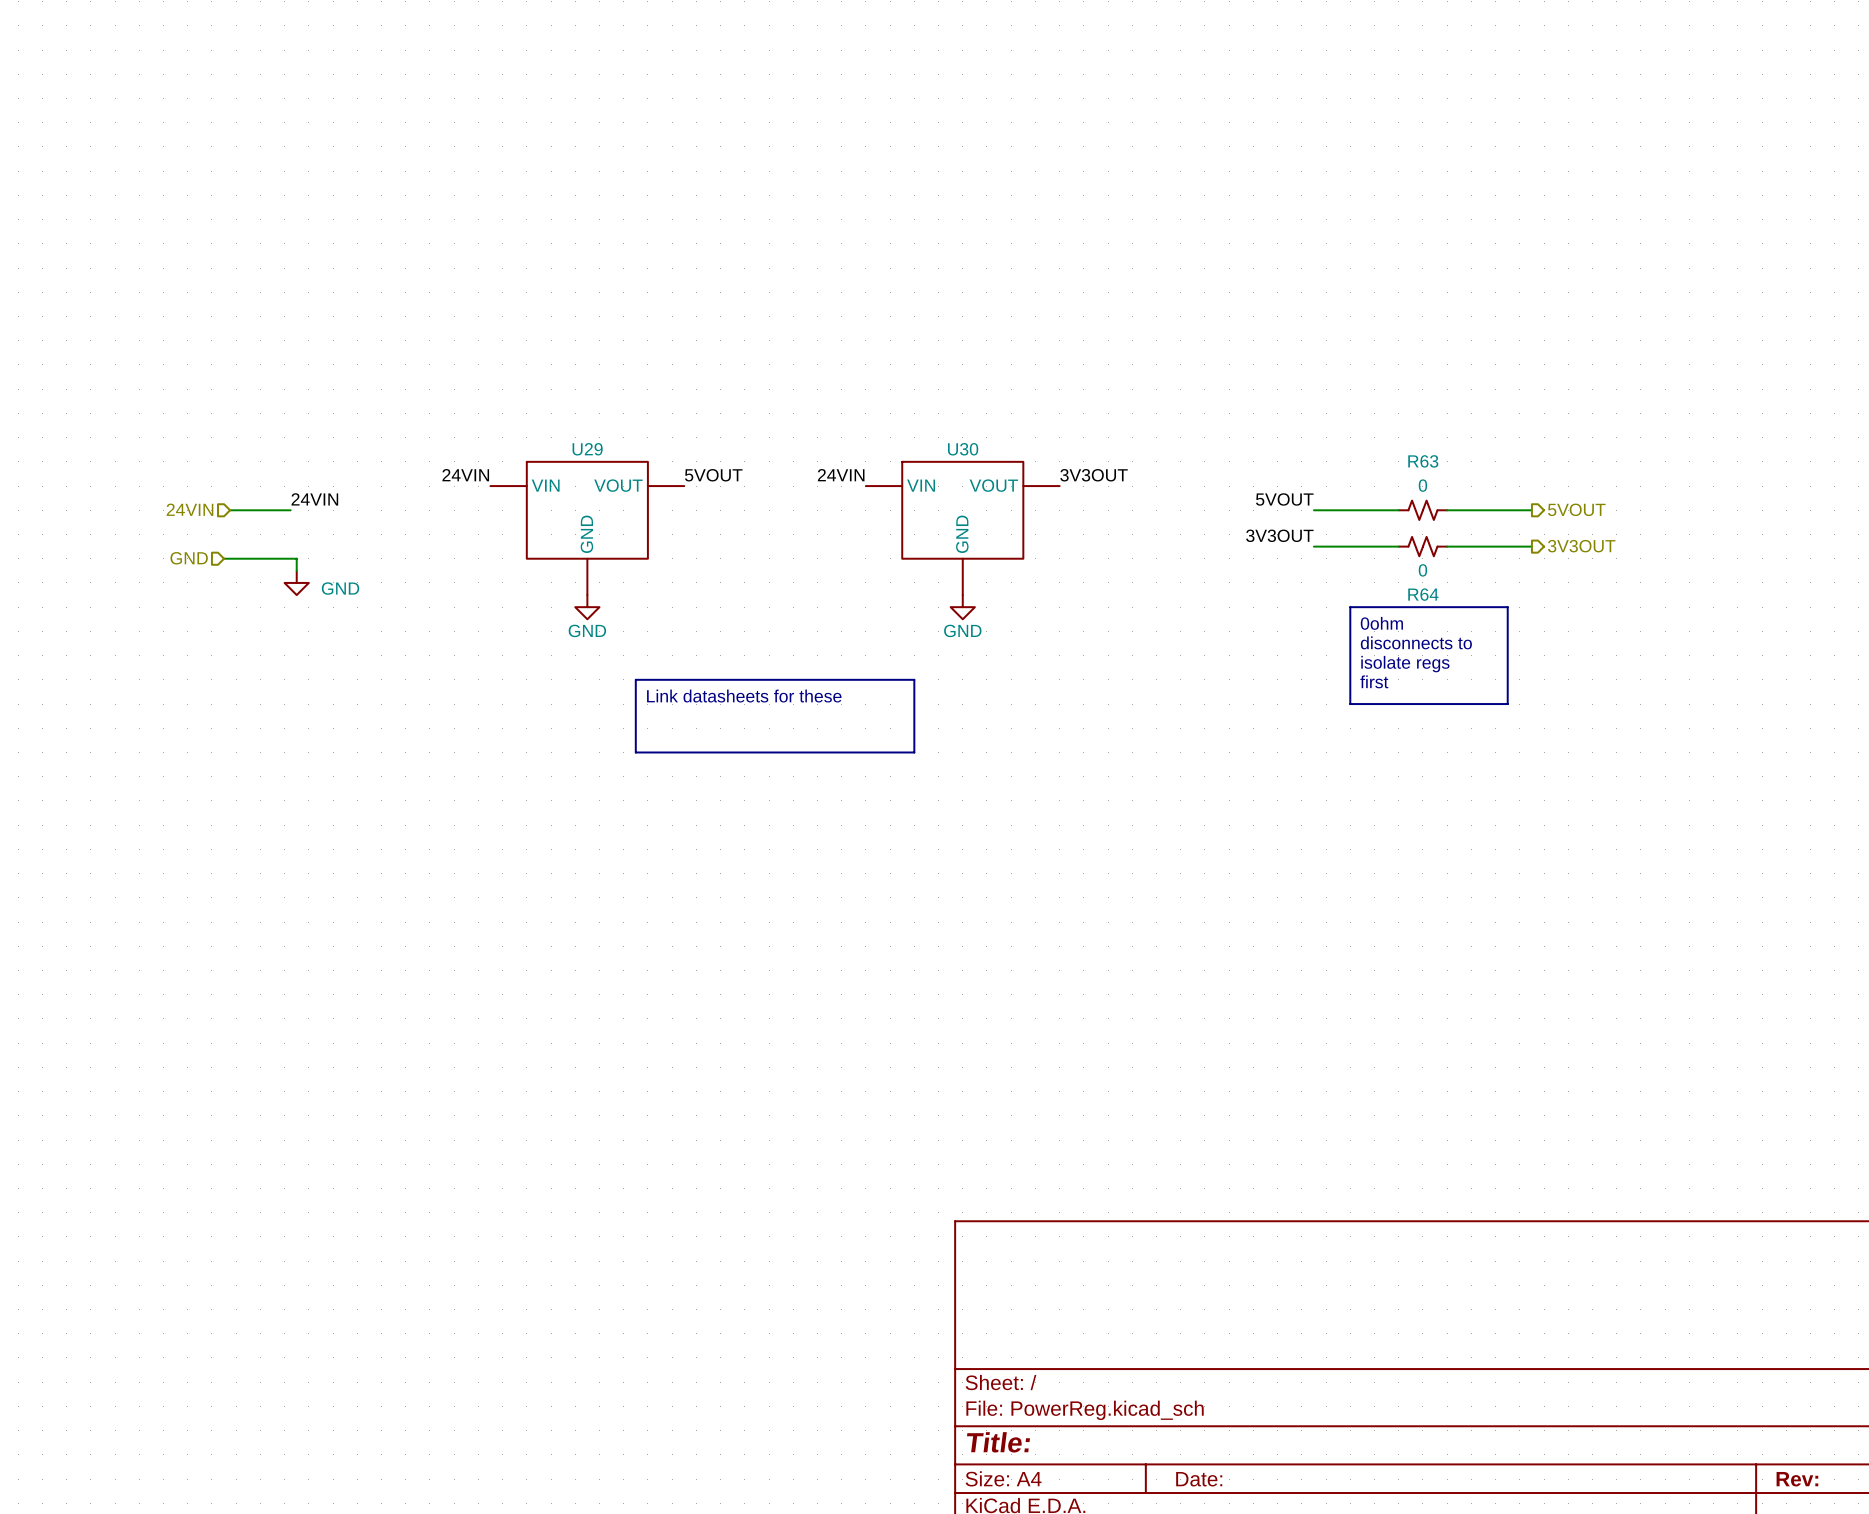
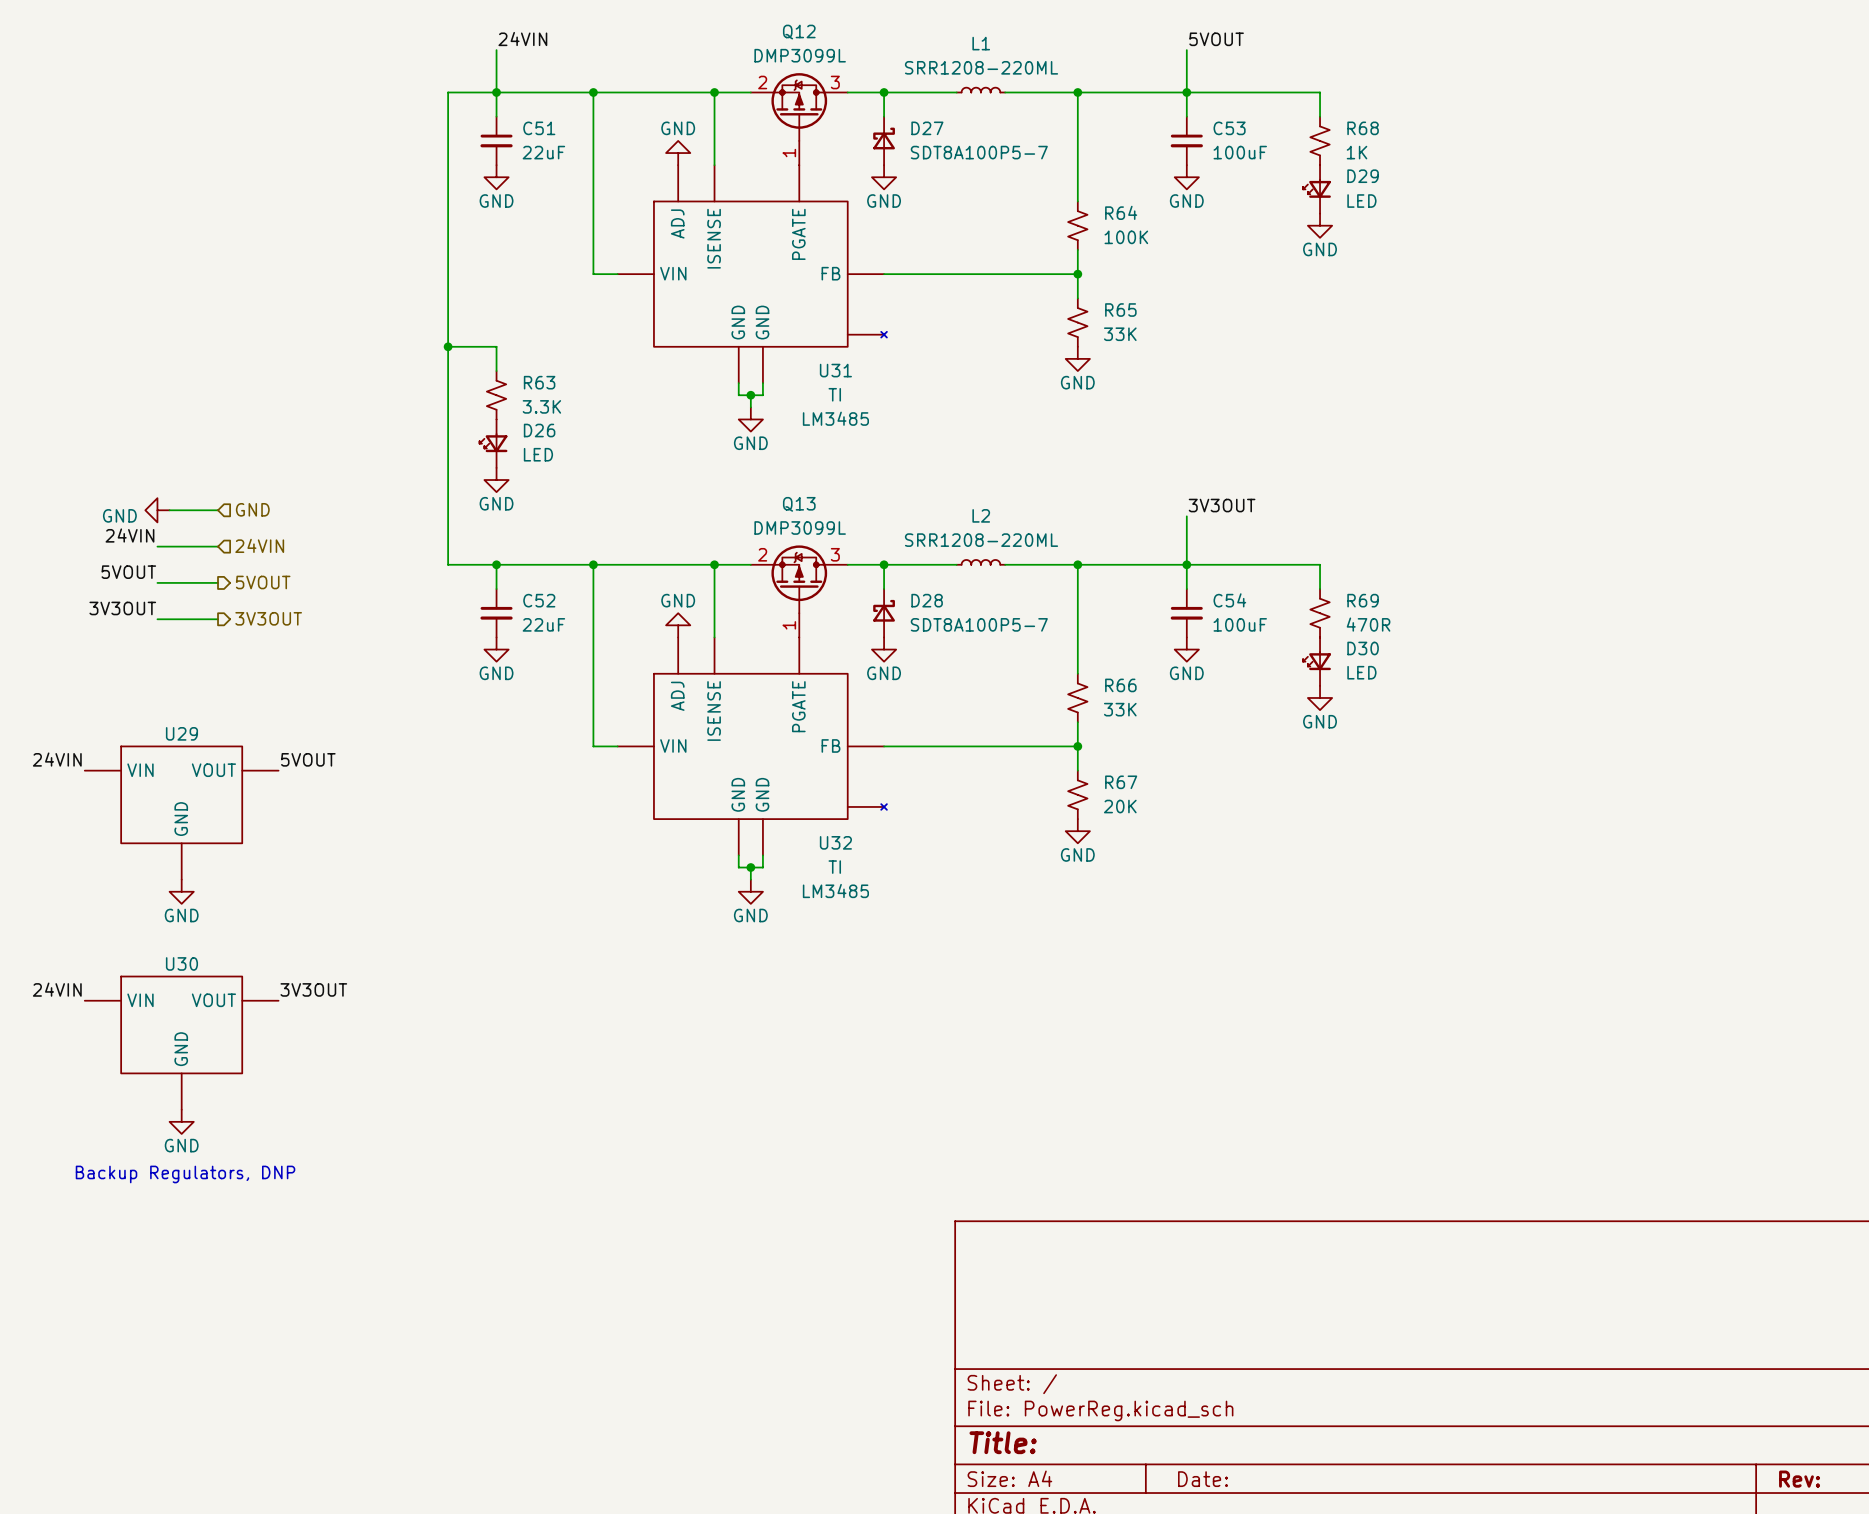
label: none -> 24VIN (522, 39)
label: none -> 5VOUT (1216, 39)
wire: none -> (496, 50) (496, 116)
wire: none -> (1186, 50) (1186, 116)
L1: none -> SRR1208-220ML (980, 90)
junction: none -> (496, 92)
wire: none -> (593, 92) (593, 274) (617, 274)
junction: none -> (593, 92)
wire: none -> (714, 92) (714, 165)
junction: none -> (714, 92)
wire: none -> (750, 92) (448, 92) (448, 564) (750, 564)
wire: none -> (847, 92) (956, 92)
wire: none -> (884, 92) (884, 116)
junction: none -> (884, 92)
wire: none -> (1005, 92) (1320, 92) (1320, 116)
wire: none -> (1077, 92) (1077, 201)
junction: none -> (1077, 92)
junction: none -> (1186, 92)
Q12: none -> DMP3099L (799, 119)
C51: none -> 22uF (496, 140)
D27: none -> SDT8A100P5-7 (884, 140)
C53: none -> 100uF (1186, 140)
R68: none -> 1K (1320, 140)
power symbol: none -> GND (678, 153)
power symbol: none -> GND (496, 177)
power symbol: none -> GND (884, 177)
power symbol: none -> GND (1186, 177)
D29: none -> LED (1316, 189)
power symbol: none -> GND (1320, 225)
wire: none -> (1077, 249) (1077, 298)
U31: none -> (752, 274)
wire: none -> (884, 274) (1077, 274)
junction: none -> (1077, 274)
R65: none -> 33K (1077, 322)
wire: none -> (448, 346) (496, 346) (496, 371)
junction: none -> (448, 346)
power symbol: none -> GND (1077, 358)
wire: none -> (738, 383) (738, 395) (762, 395) (762, 383)
wire: none -> (750, 395) (750, 407)
junction: none -> (750, 395)
power symbol: none -> GND (750, 419)
D26: none -> LED (493, 443)
label: 24VIN (465, 475) -> none
label: 5VOUT (713, 475) -> none
label: 24VIN (841, 475) -> none
label: 3V3OUT (1094, 475) -> none
power symbol: none -> GND (496, 480)
R63 value: 0 (1422, 485) -> 3.3K (541, 406)
label position: 24VIN (314, 499) -> 24VIN (129, 535)
label: 5VOUT (1284, 499) -> 3V3OUT (1222, 505)
hierarchical label rotation: 0° (190, 509) -> 180° (259, 545)
hierarchical label position: 24VIN (190, 509) -> 24VIN (259, 545)
hierarchical label: 5VOUT (1576, 509) -> none
power symbol: none -> GND (157, 510)
wire: none -> (169, 510) (218, 510)
wire: (230, 510) (290, 510) -> (157, 546) (218, 546)
wire: (1313, 510) (1398, 510) -> none
R63 rotation: 0° (1422, 510) -> 90° clockwise (496, 395)
R63 position: (1422, 510) -> (496, 395)
wire: (1447, 510) (1531, 510) -> none
wire: none -> (1186, 516) (1186, 589)
U29 position: (587, 528) -> (181, 813)
U30 position: (962, 528) -> (181, 1043)
label: 3V3OUT (1279, 535) -> none
wire: (1313, 546) (1398, 546) -> none
R64 rotation: 0° (1422, 546) -> 90° clockwise (1077, 225)
R64 position: (1422, 546) -> (1077, 225)
wire: (1447, 546) (1531, 546) -> none
hierarchical label: 3V3OUT (1581, 546) -> none
hierarchical label rotation: 0° (189, 558) -> 180° (252, 509)
hierarchical label position: GND (189, 558) -> GND (252, 509)
wire: (224, 558) (296, 558) (296, 570) -> none
L2: none -> SRR1208-220ML (980, 562)
wire: none -> (496, 564) (496, 589)
junction: none -> (496, 564)
wire: none -> (593, 564) (593, 746) (617, 746)
junction: none -> (593, 564)
wire: none -> (714, 564) (714, 637)
junction: none -> (714, 564)
wire: none -> (847, 564) (956, 564)
wire: none -> (884, 564) (884, 589)
junction: none -> (884, 564)
wire: none -> (1005, 564) (1320, 564) (1320, 589)
wire: none -> (1077, 564) (1077, 673)
junction: none -> (1077, 564)
junction: none -> (1186, 564)
R64 value: 0 (1422, 570) -> 100K (1126, 237)
label: none -> 5VOUT (128, 572)
wire: none -> (157, 582) (218, 582)
hierarchical label: none -> 5VOUT (263, 582)
power symbol: GND (296, 582) -> none
Q13: none -> DMP3099L (799, 591)
R64 name position: R64 (1423, 594) -> R64 (1121, 212)
power symbol: GND (587, 607) -> none
power symbol position: GND (962, 607) -> GND (884, 649)
line: (1350, 607) (1507, 607) (1507, 704) (1350, 704) (1350, 607) -> none
label: none -> 3V3OUT (122, 608)
C52: none -> 22uF (496, 613)
D28: none -> SDT8A100P5-7 (884, 613)
C54: none -> 100uF (1186, 613)
R69: none -> 470R (1320, 613)
hierarchical label: none -> 3V3OUT (268, 618)
wire: none -> (157, 619) (218, 619)
text: 0ohm (1381, 623) -> none
power symbol: none -> GND (678, 625)
text: disconnects to (1416, 642) -> none
power symbol: none -> GND (496, 649)
power symbol: none -> GND (1186, 649)
D30: none -> LED (1316, 661)
text: isolate regs (1405, 664) -> none
line: (635, 679) (914, 679) (914, 752) (635, 752) (635, 679) -> none
text: first (1374, 681) -> none
text: Link datasheets for these (744, 696) -> none
R66: none -> 33K (1077, 697)
power symbol: none -> GND (1320, 697)
wire: none -> (1077, 722) (1077, 770)
U32: none -> (752, 746)
wire: none -> (884, 746) (1077, 746)
junction: none -> (1077, 746)
label: none -> 24VIN (57, 759)
label: none -> 5VOUT (308, 759)
R67: none -> 20K (1077, 794)
power symbol: none -> GND (1077, 831)
wire: none -> (738, 855) (738, 867) (762, 867) (762, 855)
wire: none -> (750, 867) (750, 879)
junction: none -> (750, 867)
power symbol: none -> GND (181, 891)
power symbol: none -> GND (750, 891)
label: none -> 24VIN (57, 989)
label: none -> 3V3OUT (313, 989)
power symbol: none -> GND (181, 1121)
text: none -> Backup Regulators, DNP (185, 1174)

